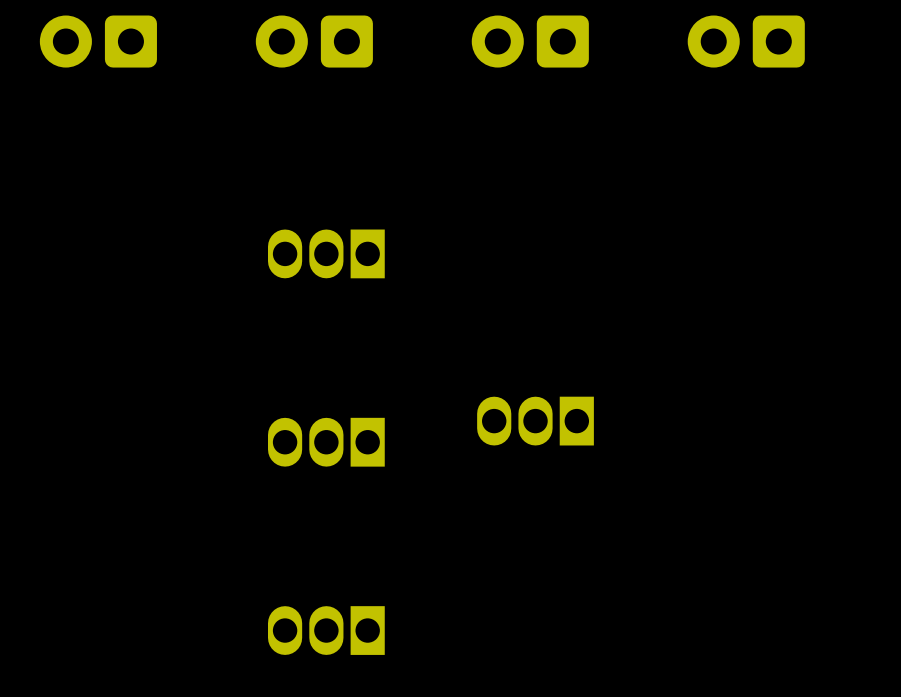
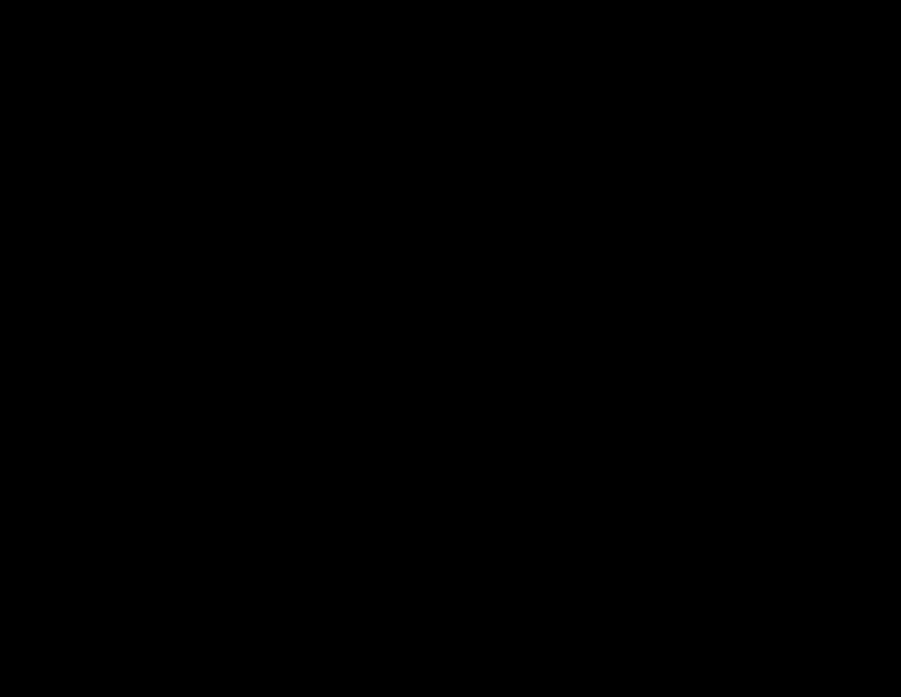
part: (98, 41) -> none
part: (314, 41) -> none
part: (530, 41) -> none
part: (746, 41) -> none
part: (326, 253) -> none
part: (535, 421) -> none
part: (326, 442) -> none
part: (326, 630) -> none

